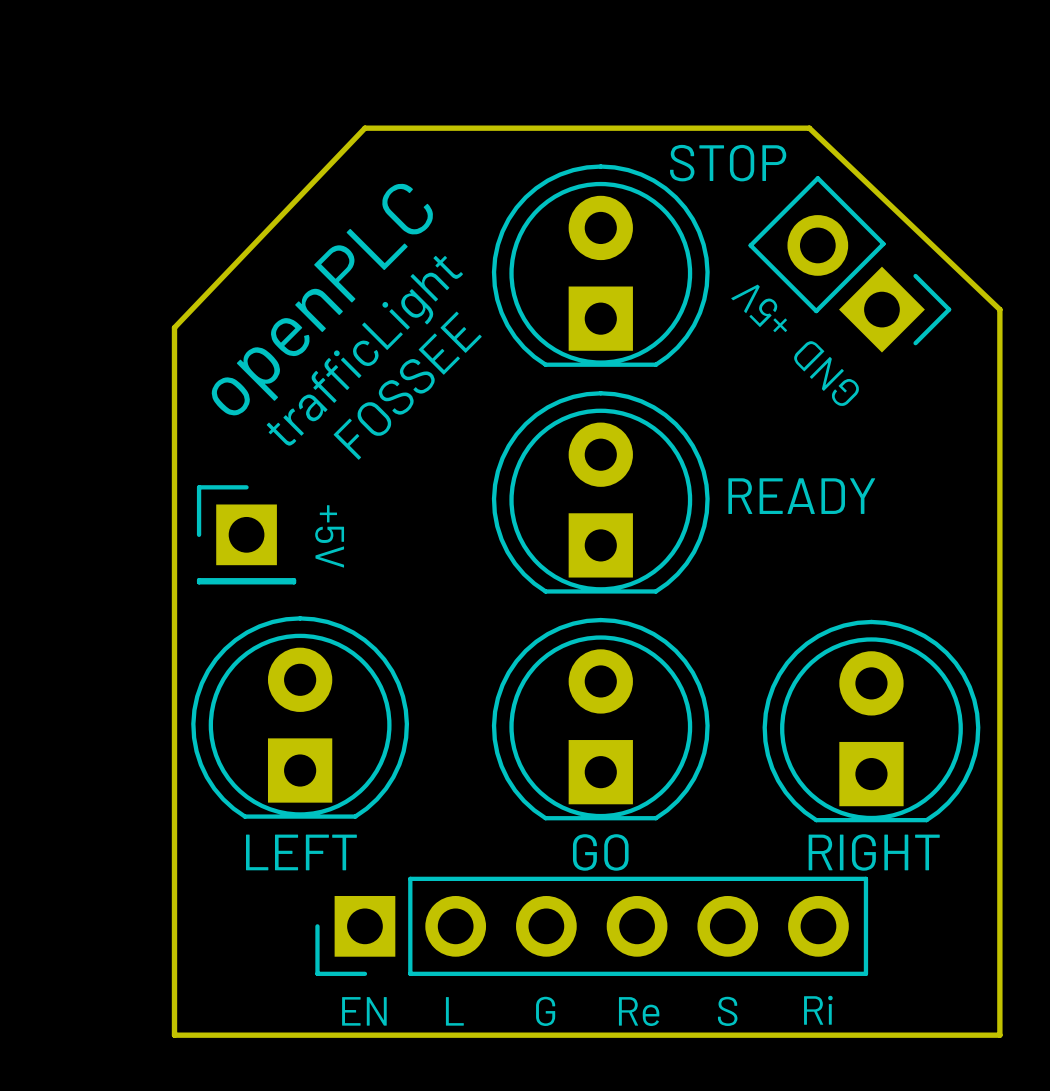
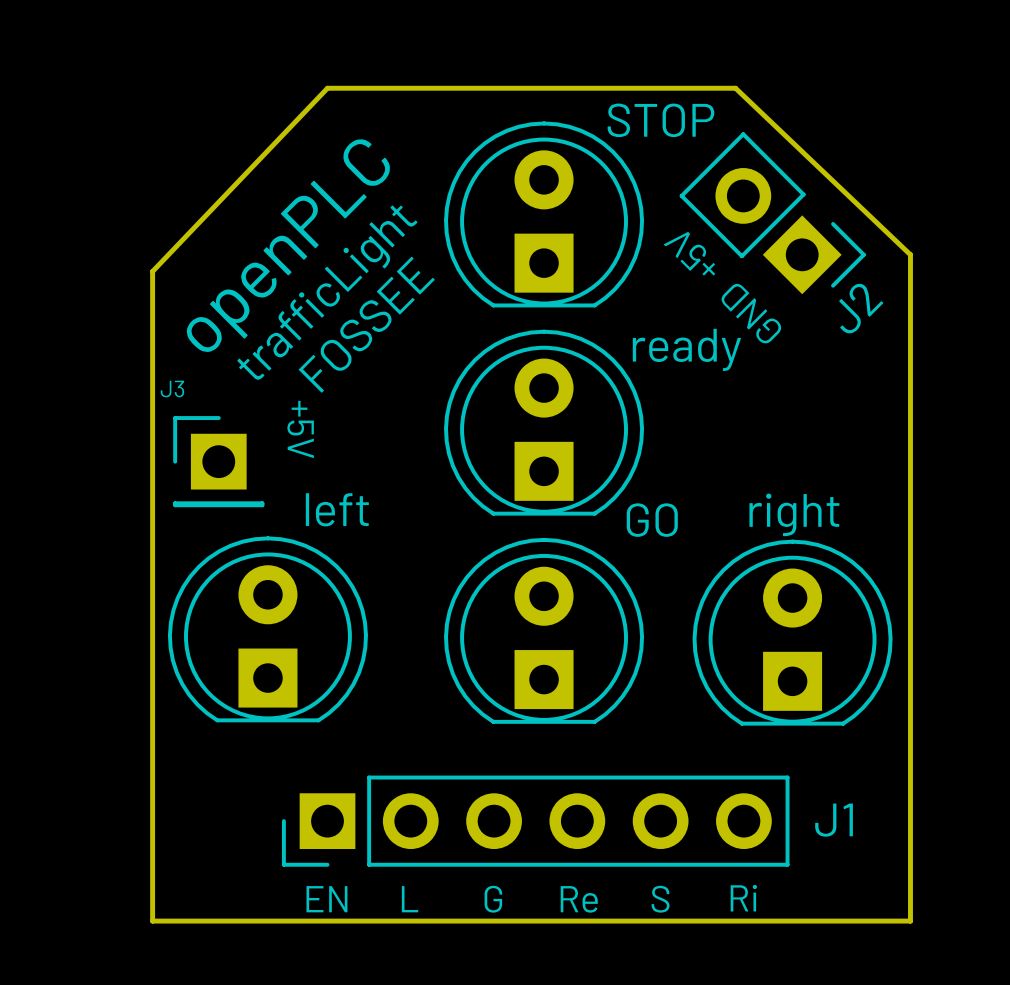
J2 name: none -> J2 (861, 308)
J3 name: none -> J3 (172, 388)
part value: READY (801, 496) -> ready (686, 349)
text position: +5V (329, 536) -> +5V (300, 429)
part value: LEFT (301, 852) -> left (337, 509)
part value position: GO (600, 852) -> GO (652, 520)
part value: RIGHT (874, 852) -> right (794, 514)
J1 name: none -> J1 (834, 820)

